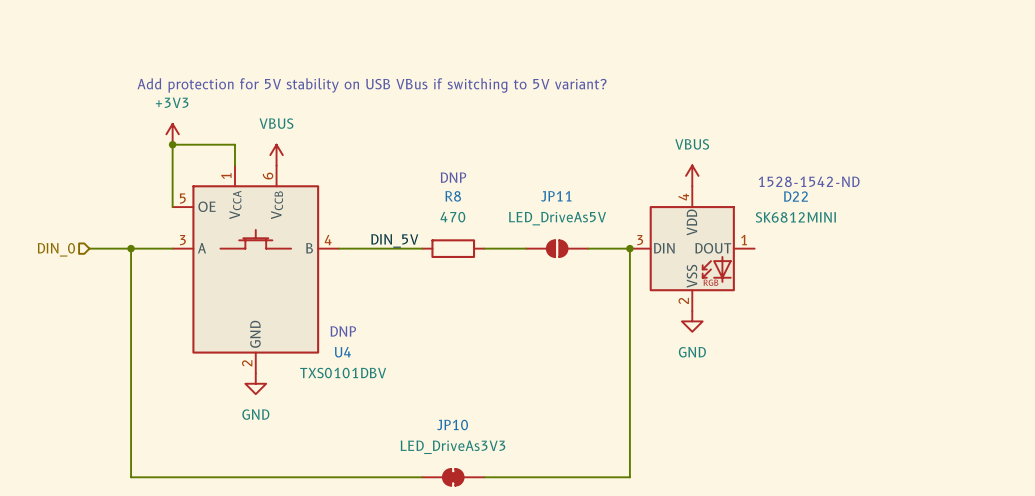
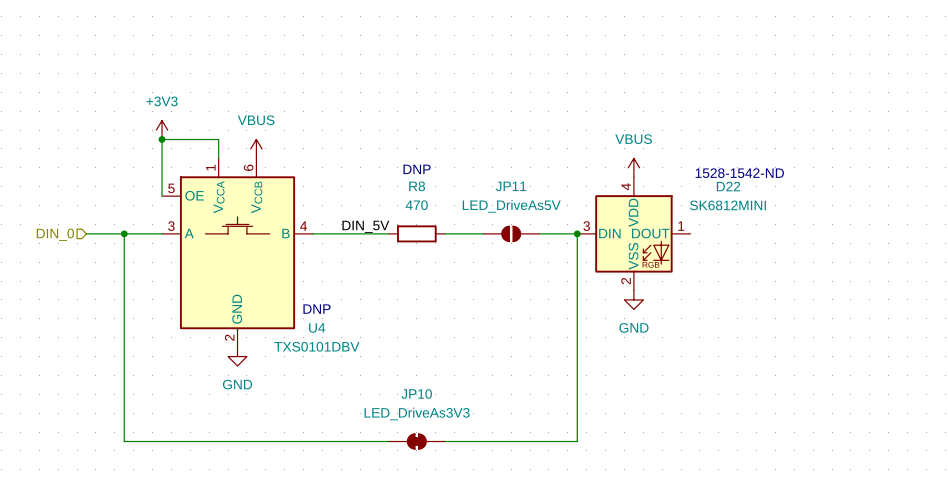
text: Add protection for 5V stability on USB VBus if switching to 5V variant? (372, 85) -> none

